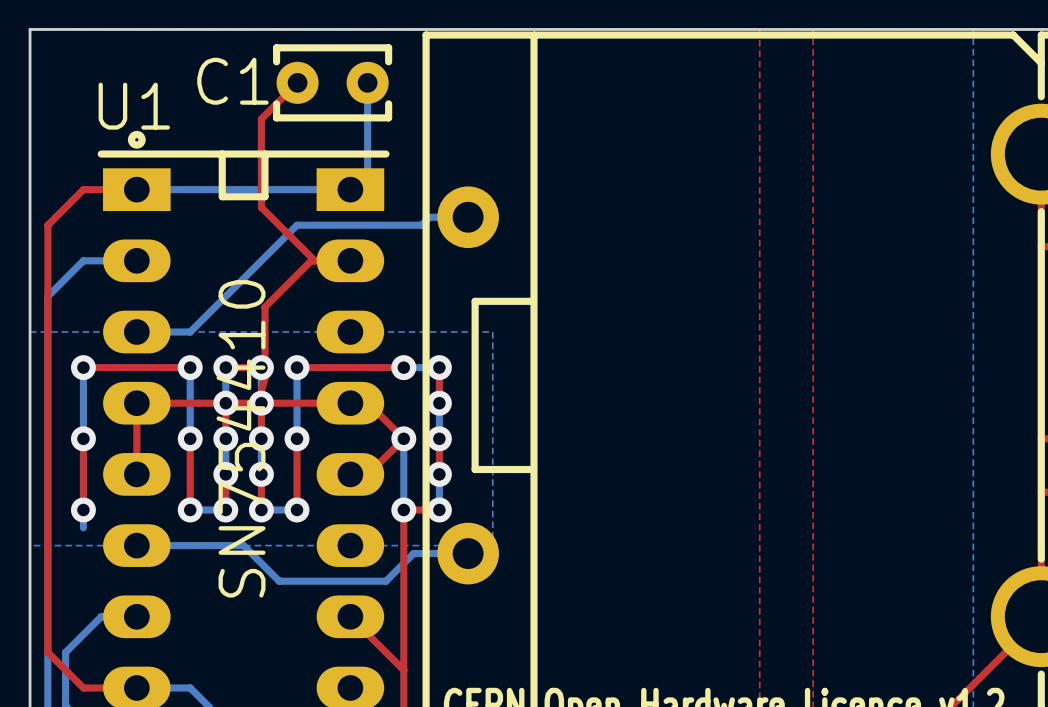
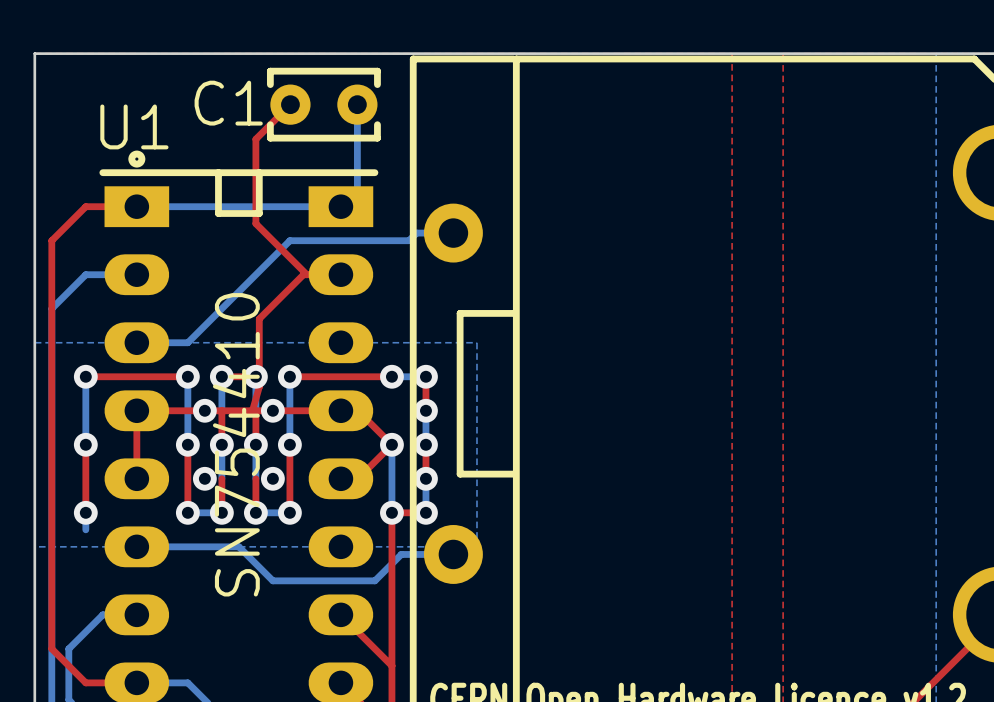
via position: (225, 403) -> (204, 410)
via position: (261, 403) -> (272, 410)
via position: (225, 474) -> (204, 478)
via position: (261, 474) -> (272, 478)

